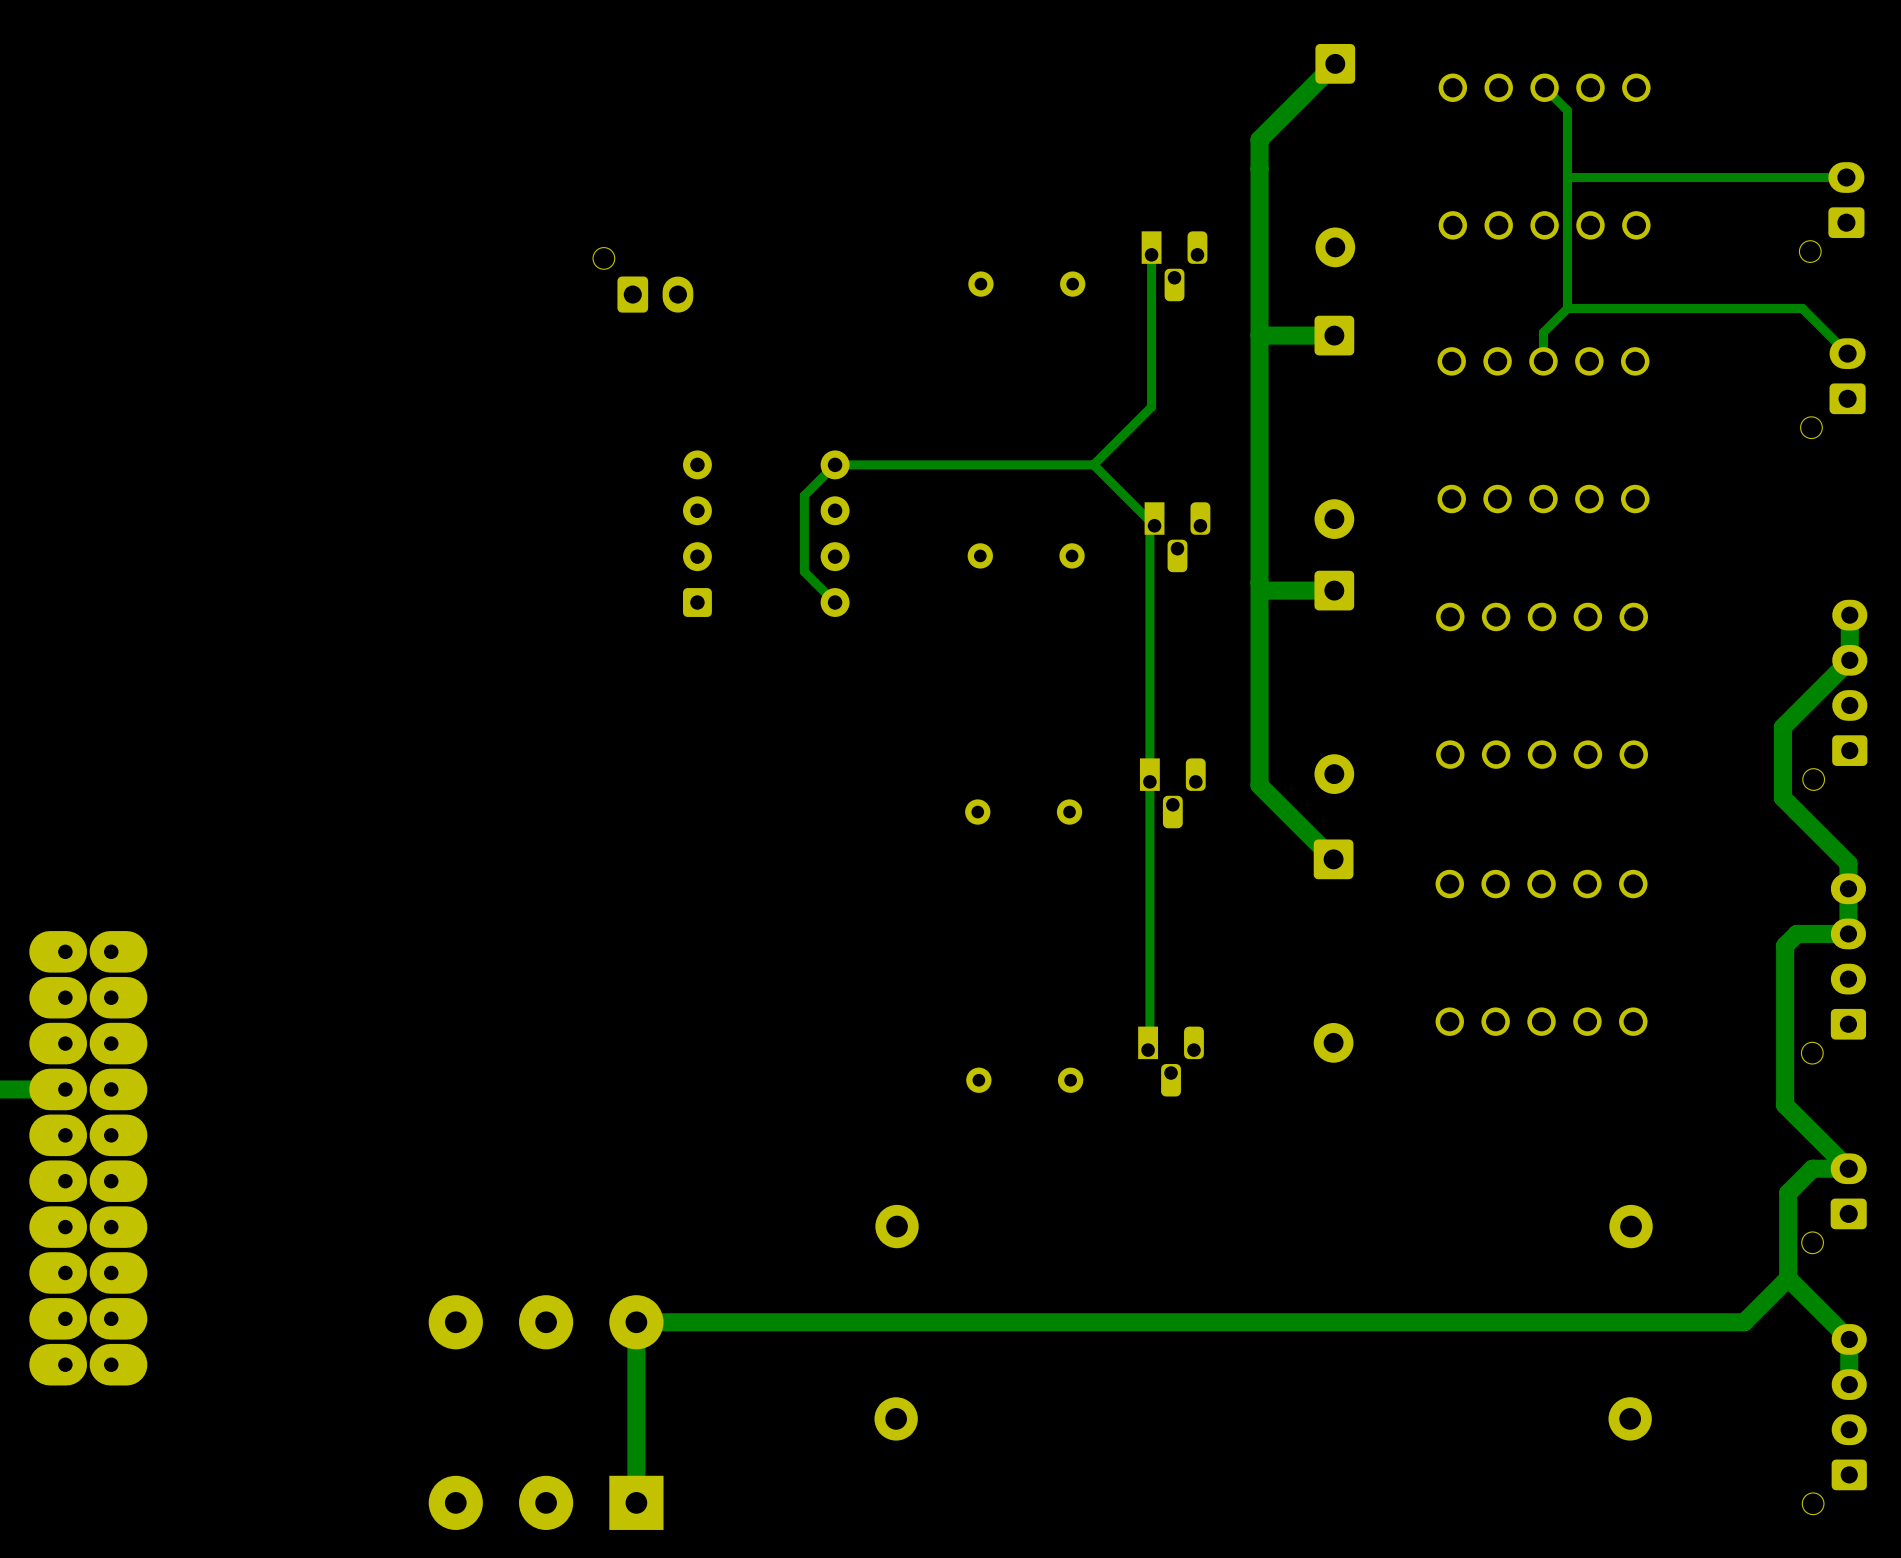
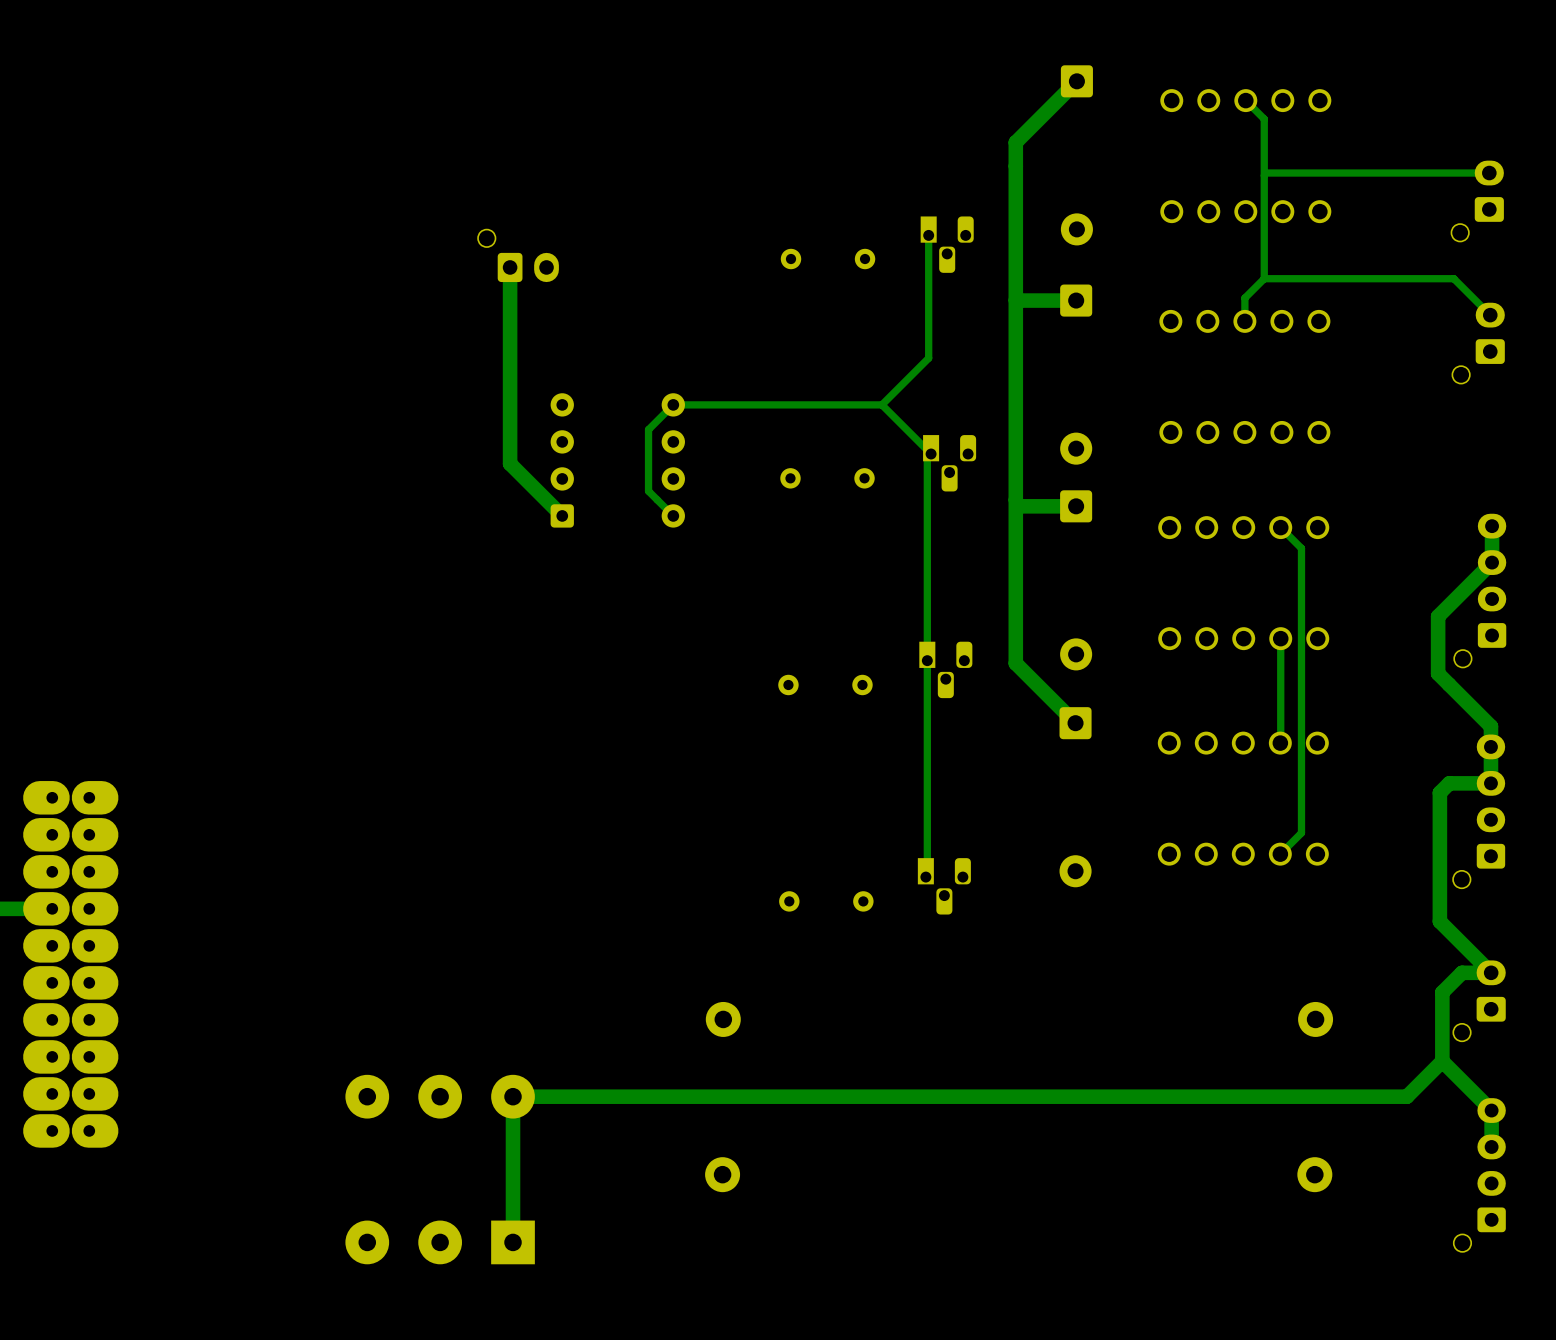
track: none -> (510, 267) (510, 463) (562, 515)
track: none -> (1280, 527) (1301, 548) (1301, 832) (1280, 854)
track: none -> (1280, 638) (1280, 743)

